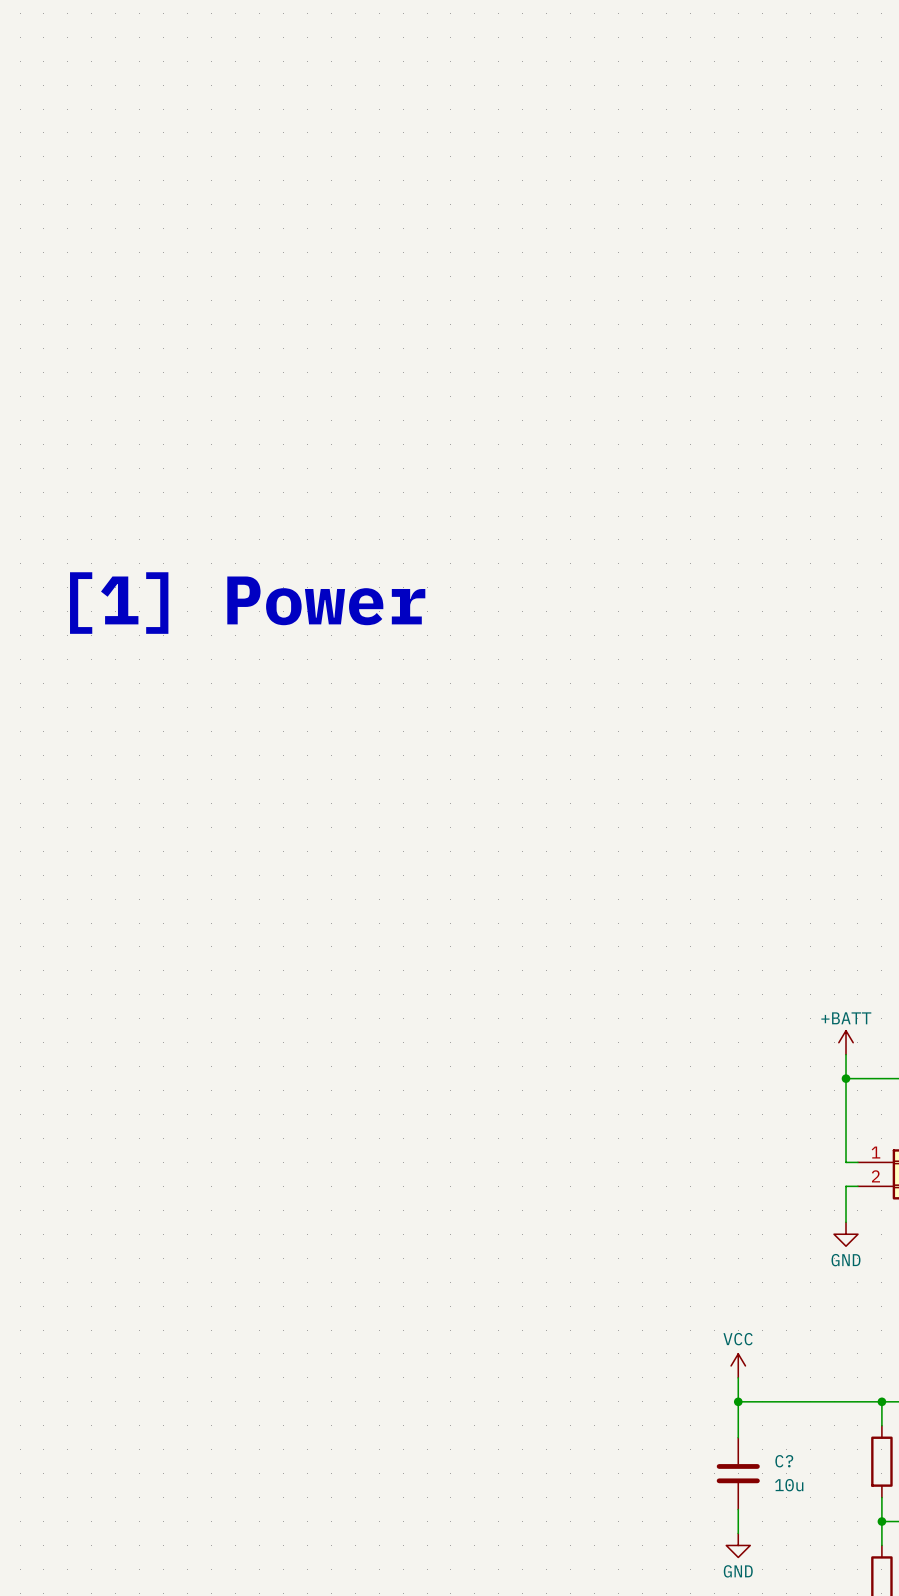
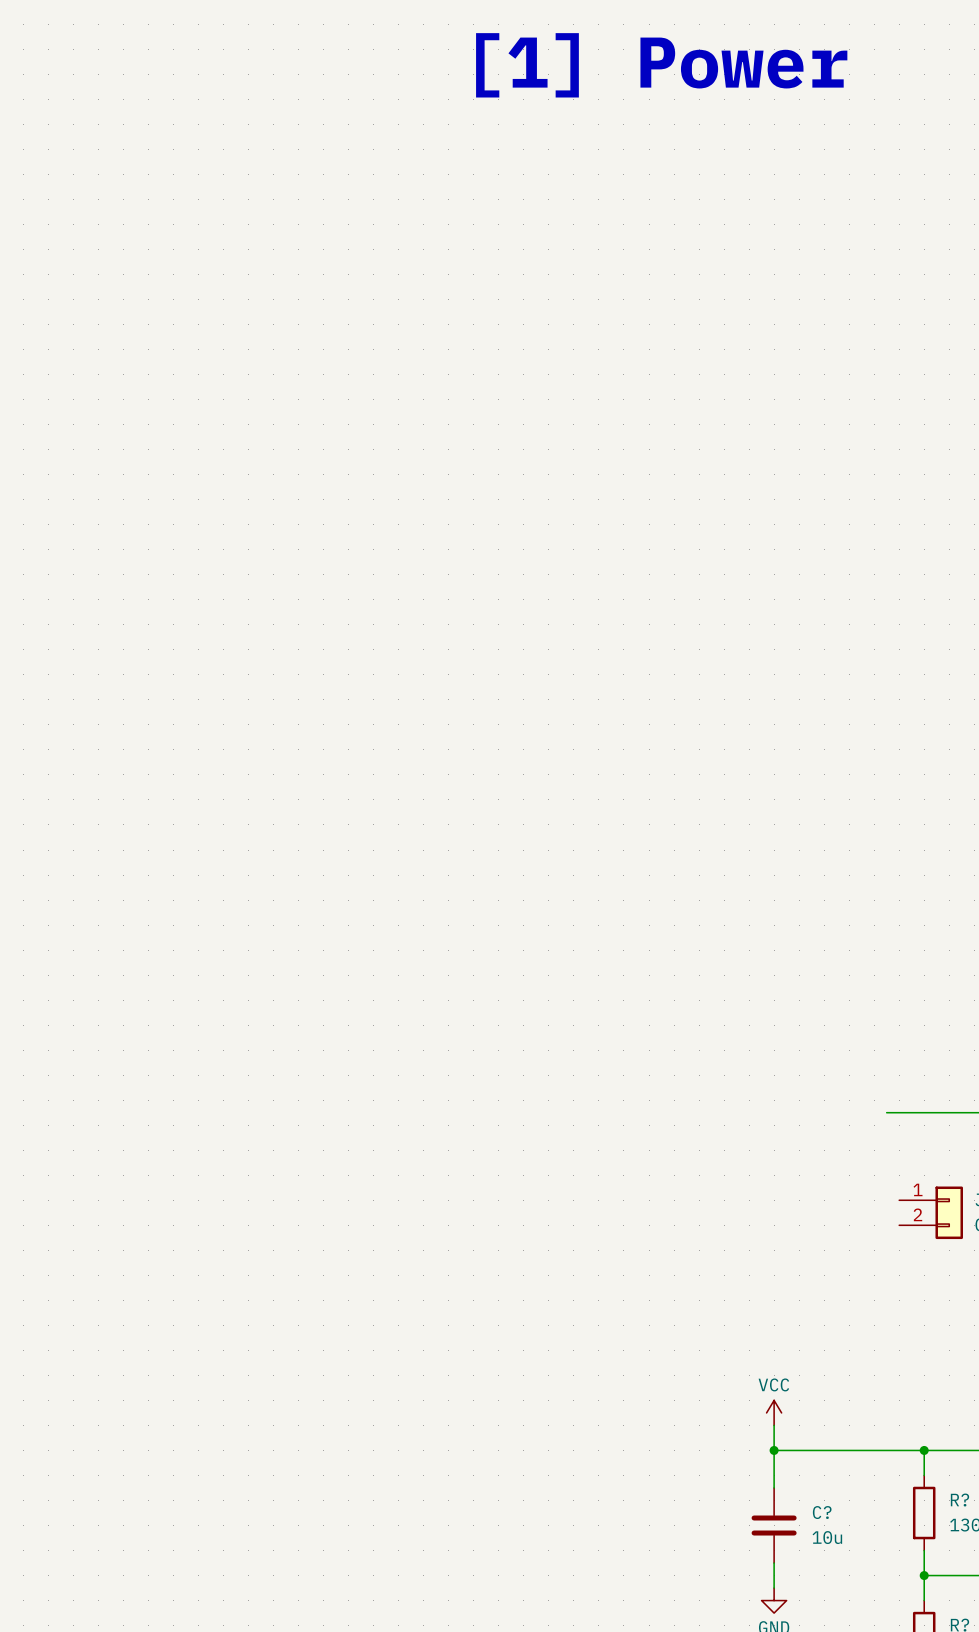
text: none -> [1] Power (661, 65)
text: [1] Power (247, 603) -> none
power symbol: +BATT (846, 1042) -> none
wire: (846, 1054) (846, 1162) (857, 1162) -> none
junction: (846, 1078) -> none
wire: (857, 1186) (846, 1186) (846, 1222) -> none
power symbol: GND (846, 1234) -> none

